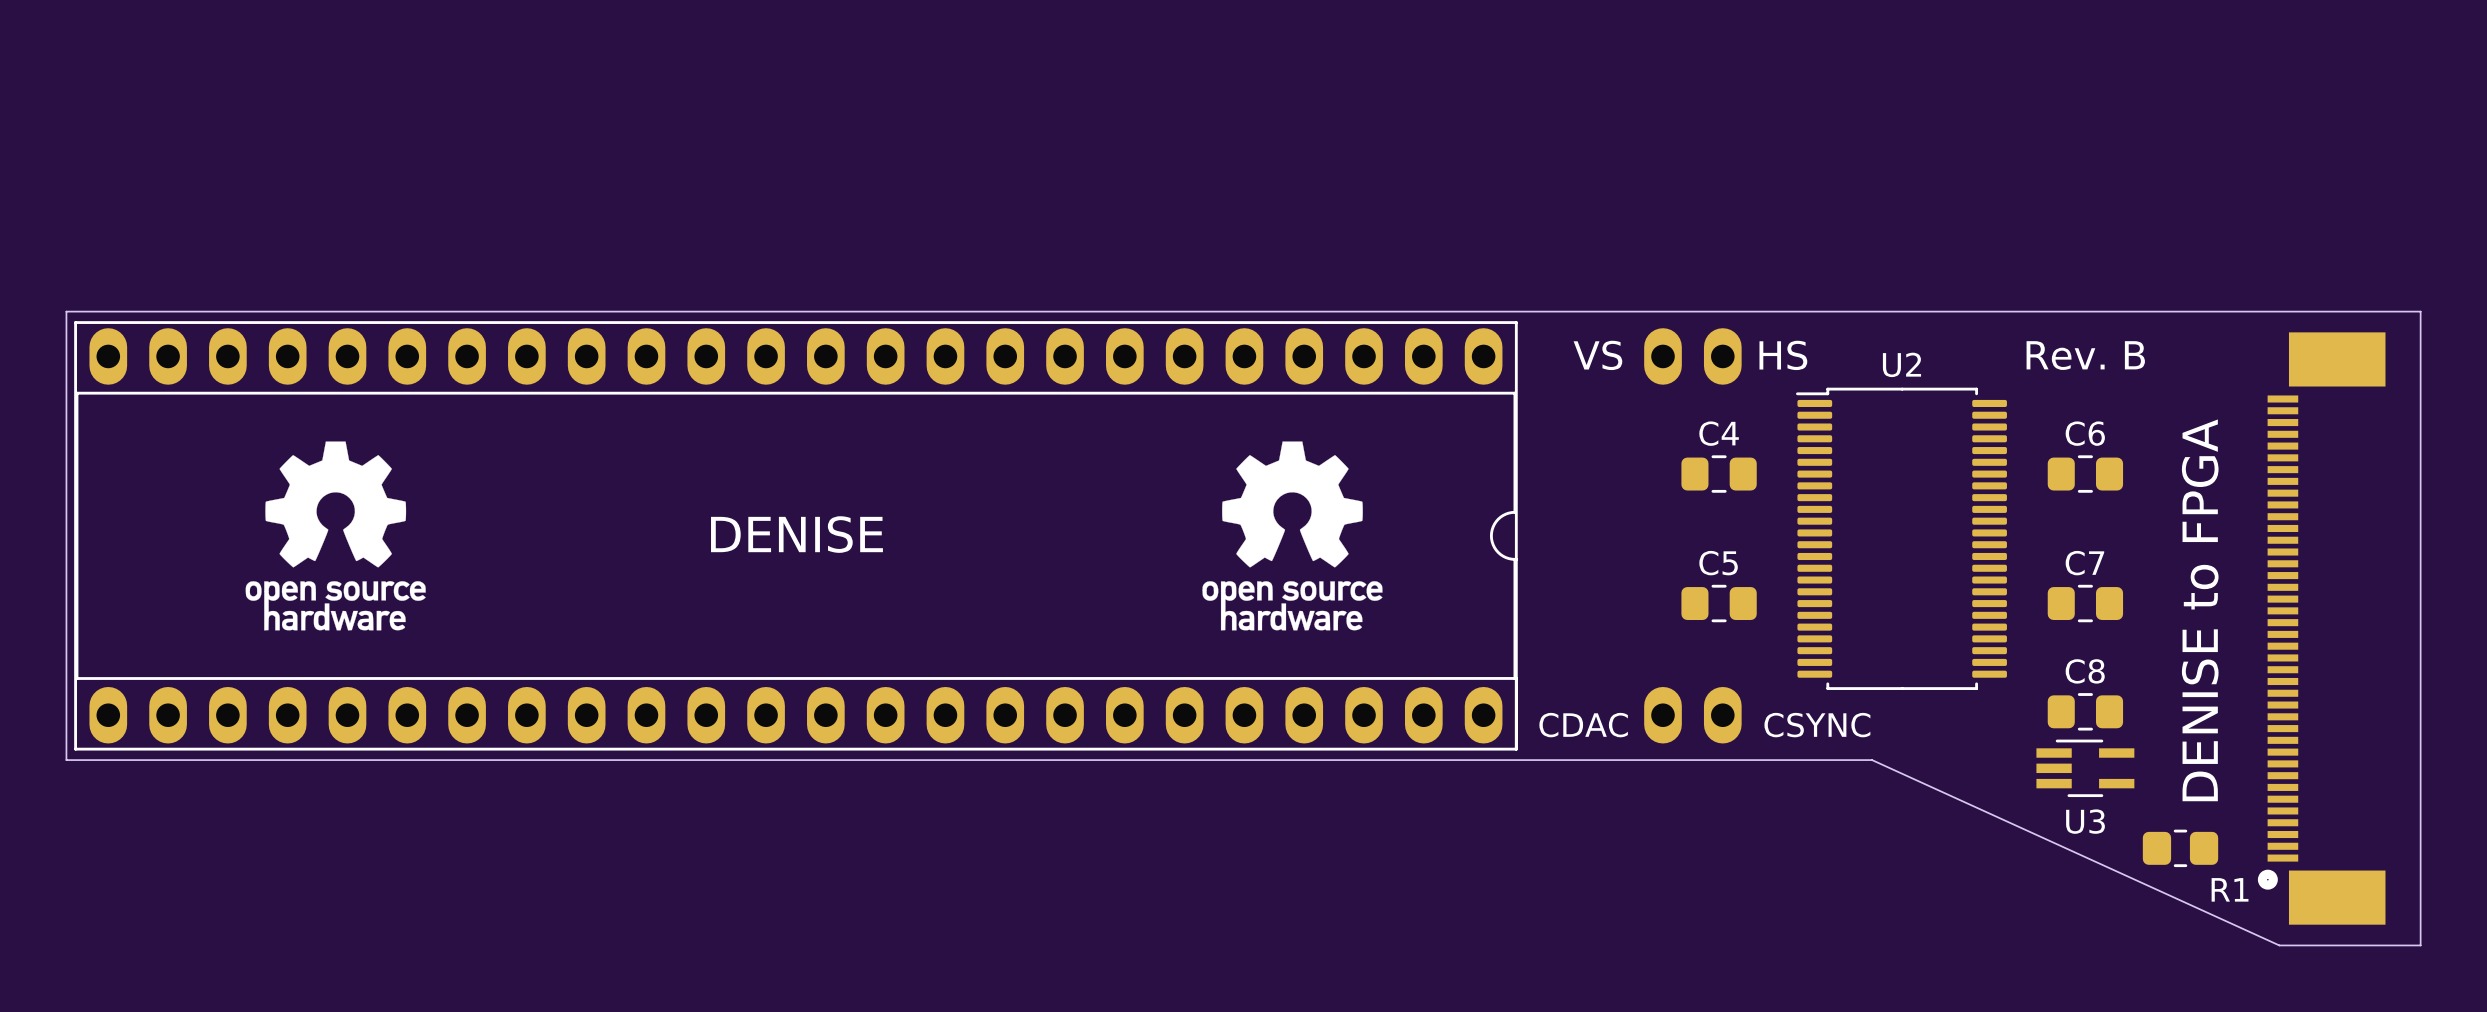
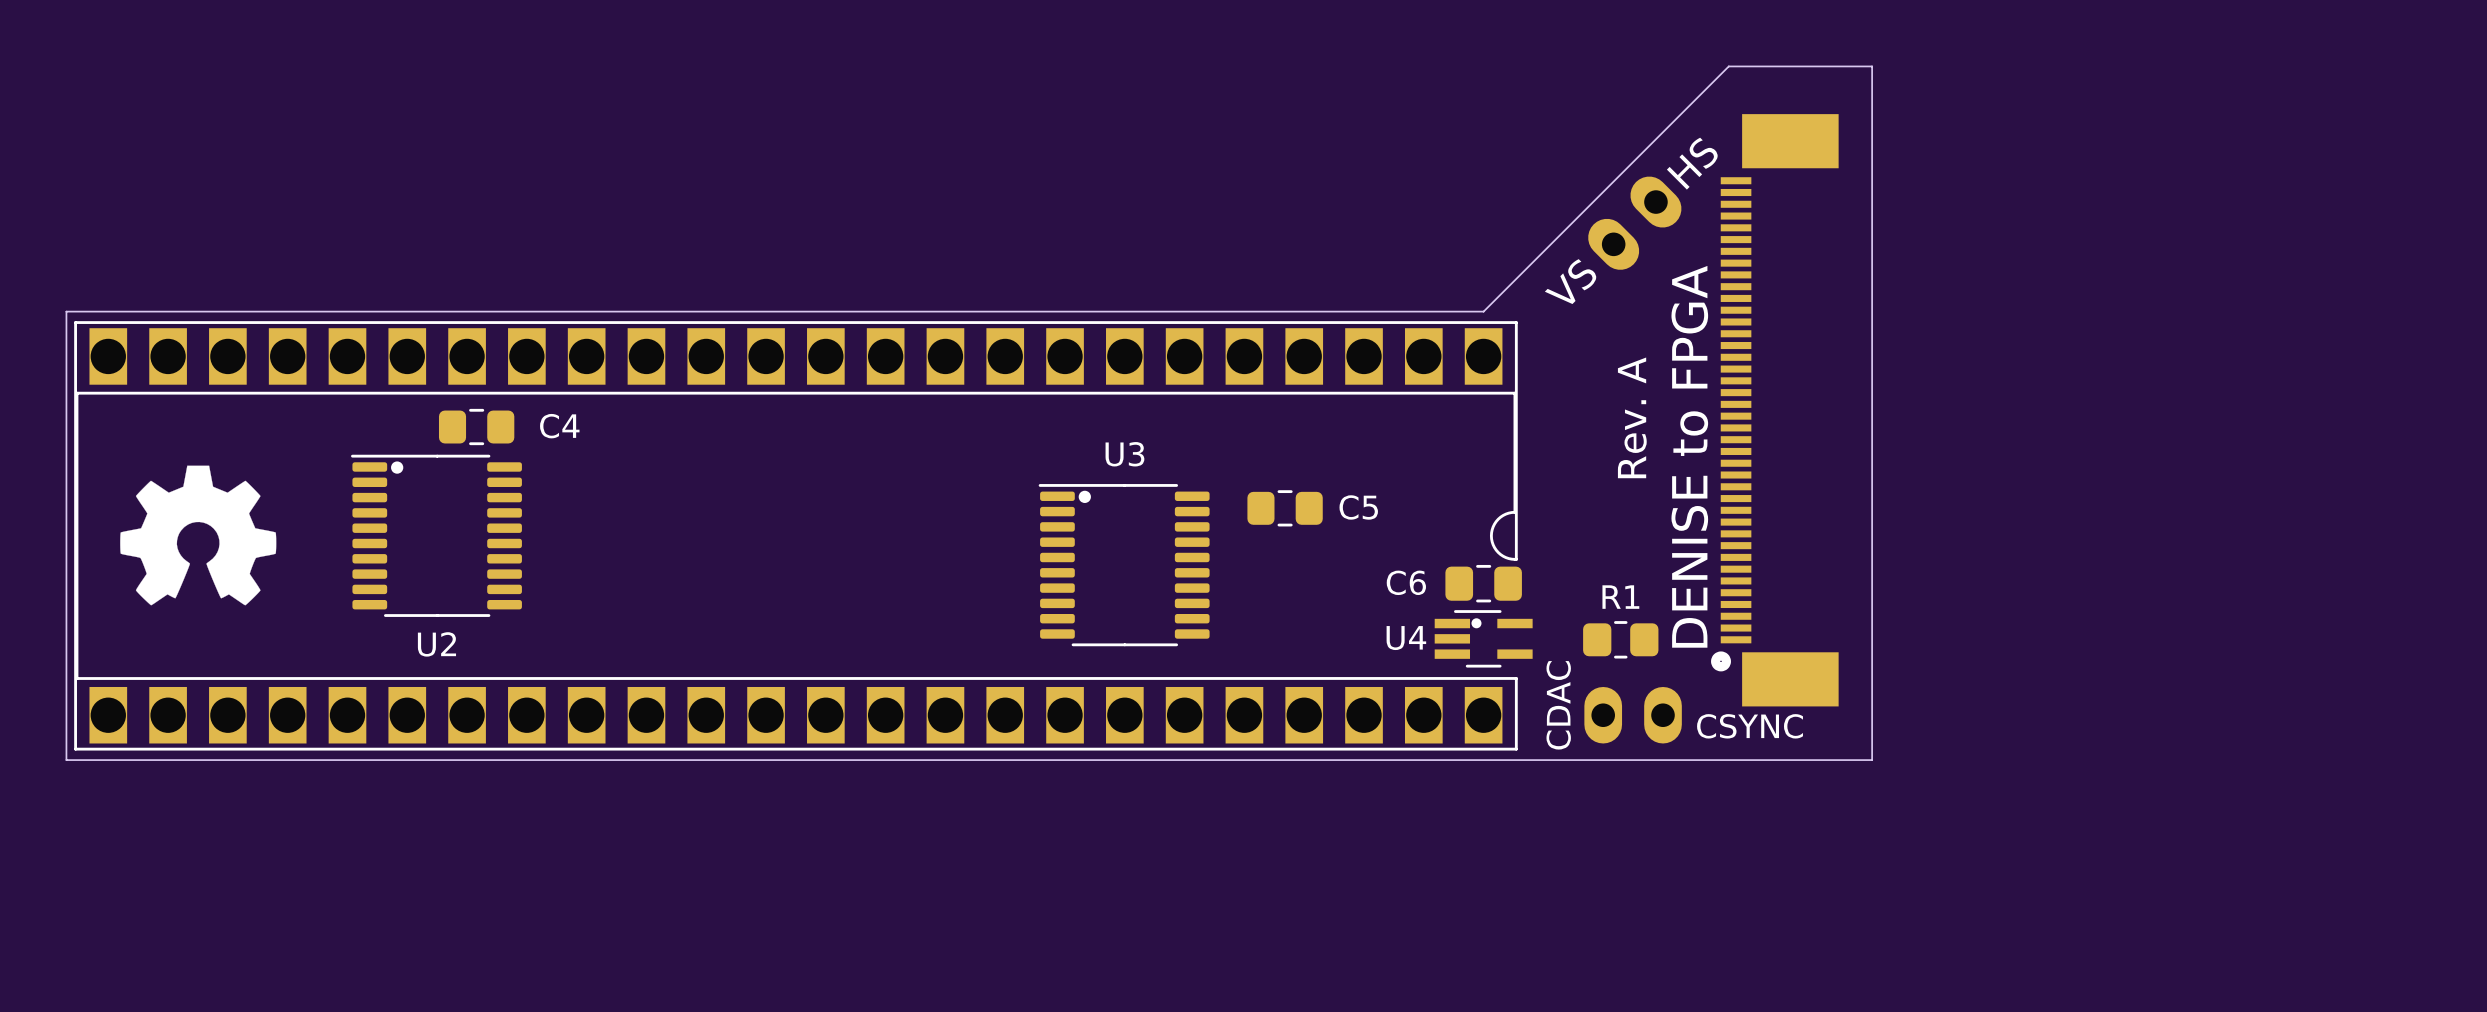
part: none -> (1634, 223)
board edge: (1483, 311) (2420, 311) (2420, 945) (2279, 945) (1872, 760) -> (1483, 311) (1728, 66) (1872, 66) (1872, 760)
part footprint: [74, 321, 1518, 751] -> [74, 321, 1518, 751]
text rotation: 0° (1597, 355) -> 45° counterclockwise (1570, 281)
text position: VS (1597, 355) -> VS (1570, 281)
text rotation: 0° (1783, 355) -> 45° counterclockwise (1692, 163)
text position: HS (1783, 355) -> HS (1692, 163)
text: Rev. B (2085, 355) -> none
part: (1692, 356) -> none
U2 name position: U2 (1901, 364) -> U2 (436, 644)
U2 footprint: [1796, 387, 2007, 690] -> [351, 454, 522, 617]
part: none -> (1774, 410)
text: none -> Rev. A (1632, 417)
C4 name position: C4 (1719, 433) -> C4 (559, 426)
C6 name position: C6 (2085, 433) -> C6 (1406, 582)
drawing: [245, 441, 426, 631] -> none
drawing: [1202, 441, 1383, 631] -> none
C4 footprint: [1681, 455, 1757, 493] -> [438, 408, 515, 446]
C6 footprint: [2047, 455, 2124, 493] -> [1445, 564, 1522, 603]
drawing: none -> [120, 465, 277, 606]
text: DENISE (796, 534) -> none
C5 name position: C5 (1718, 563) -> C5 (1358, 507)
C5 footprint: [1681, 584, 1757, 623] -> [1247, 490, 1323, 527]
C7: (2085, 603) -> none
text position: DENISE to FPGA (2200, 610) -> DENISE to FPGA (1689, 456)
part: (2321, 628) -> none
U4: none -> (1483, 638)
C8: (2085, 711) -> none
part position: (1692, 715) -> (1633, 715)
text rotation: 0° (1583, 725) -> 90° counterclockwise (1558, 705)
text position: CSYNC (1817, 725) -> CSYNC (1750, 726)
U3 footprint: [2036, 739, 2135, 798] -> [1038, 484, 1210, 647]
U3 name position: U3 (2085, 821) -> U3 (1124, 454)
R1 position: (2180, 848) -> (1620, 639)
R1 name position: R1 (2230, 889) -> R1 (1620, 597)

